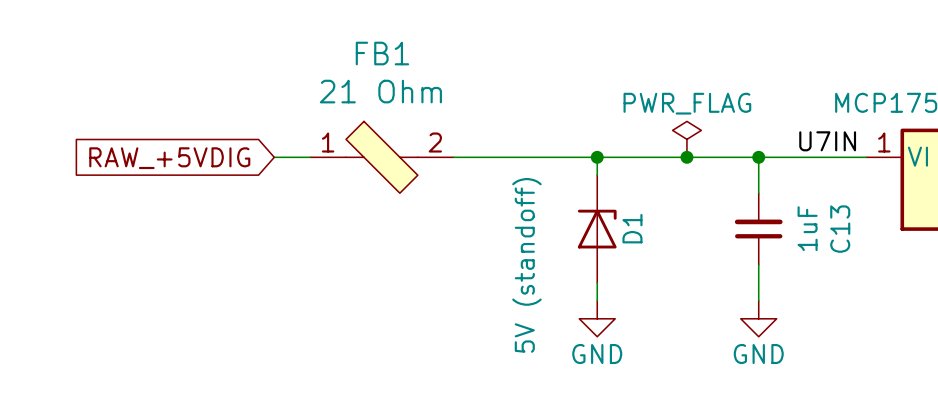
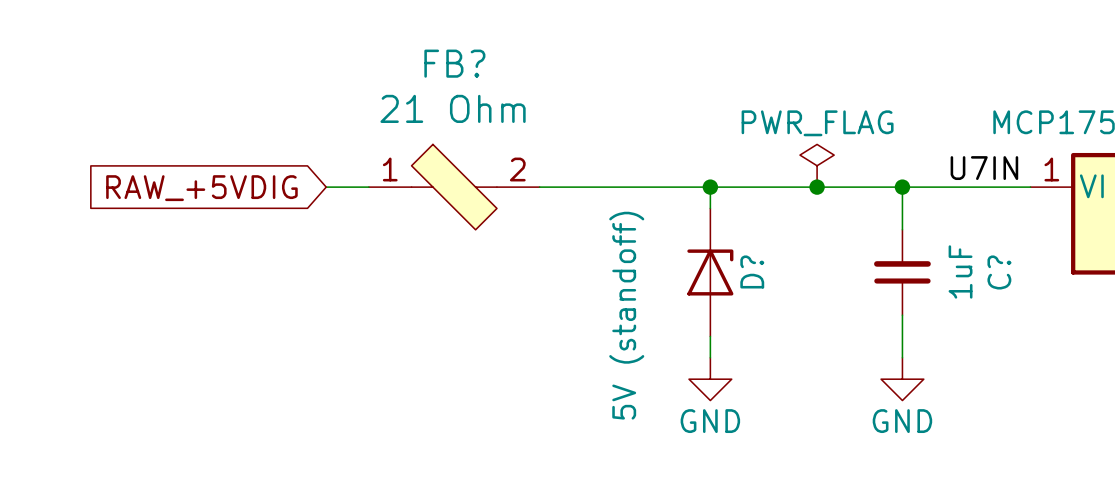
FB1 name: FB1 (382, 53) -> FB? (454, 63)
D1 name: D1 (632, 228) -> D? (752, 271)
C13 name: C13 (840, 229) -> C? (999, 272)

